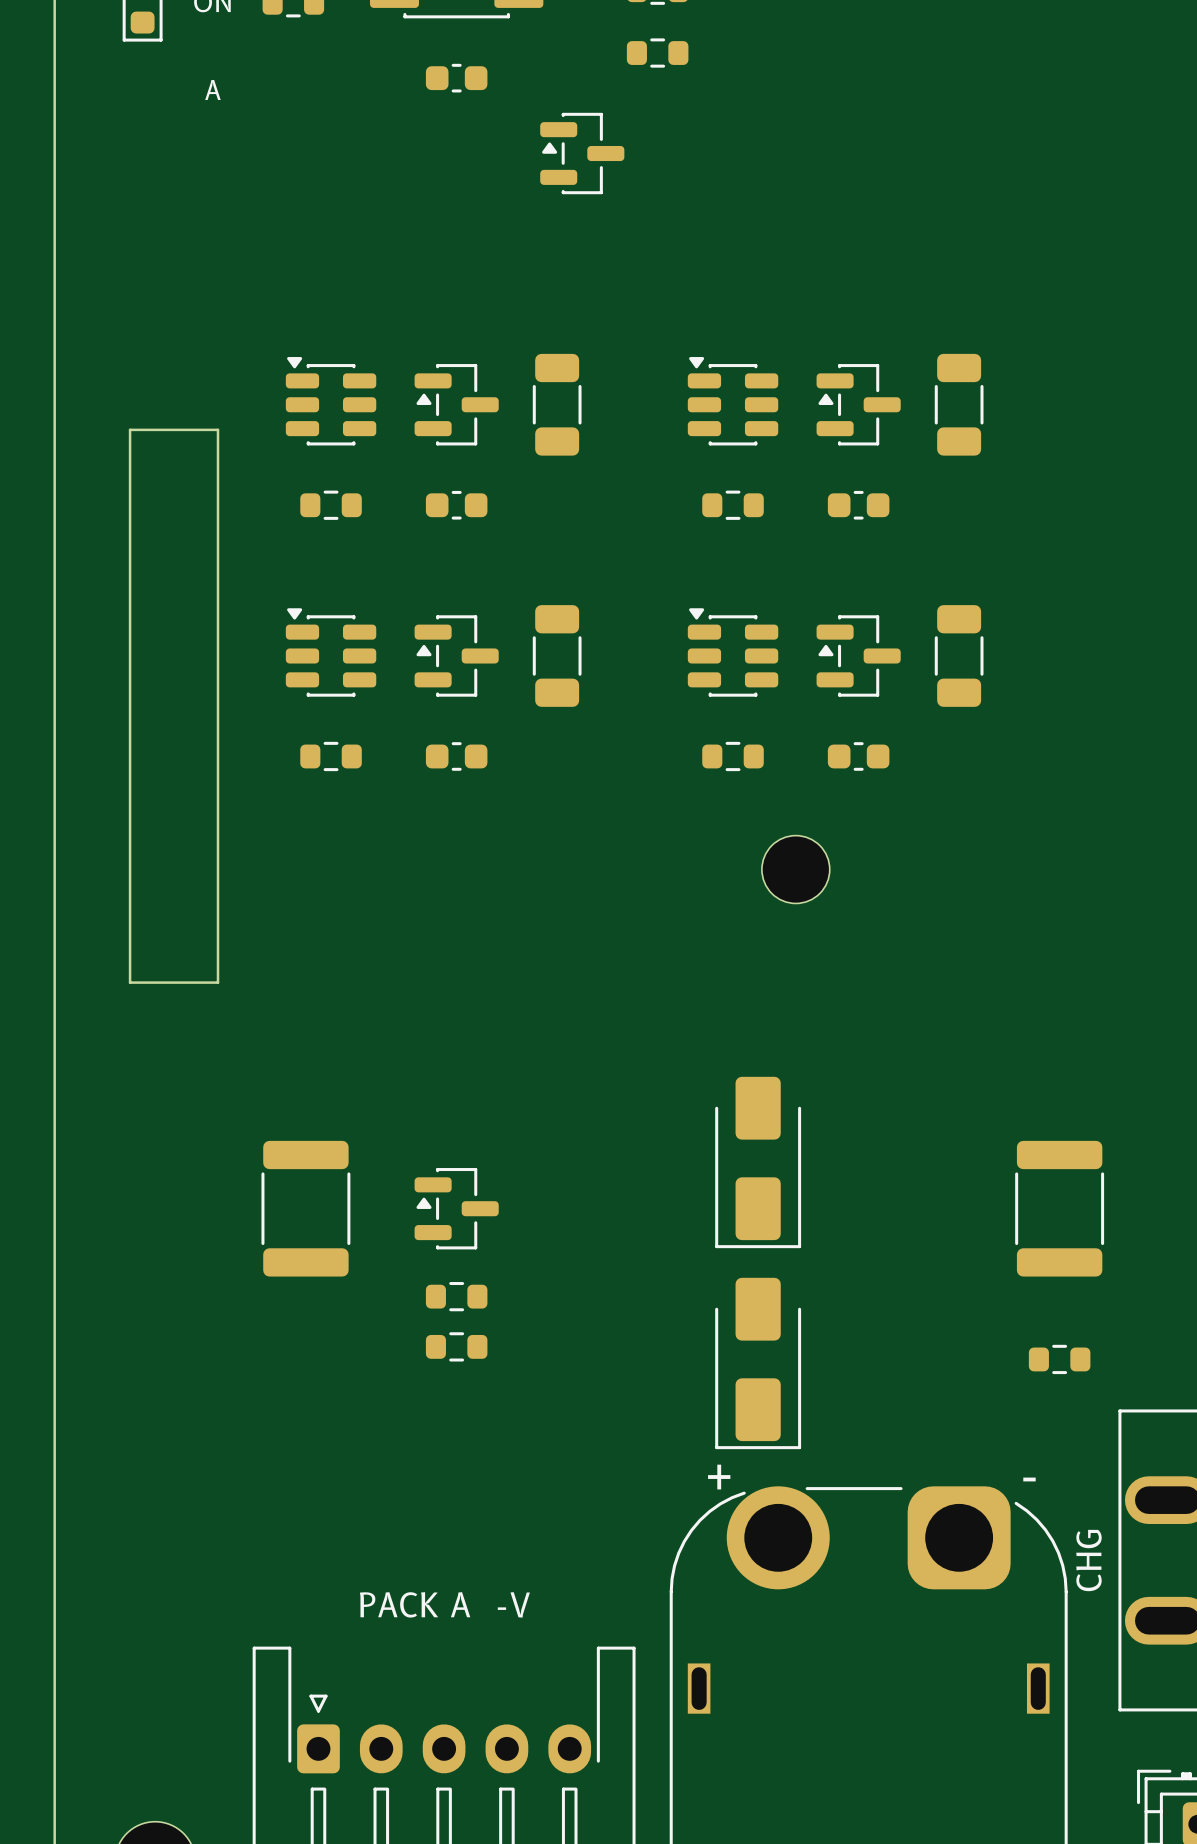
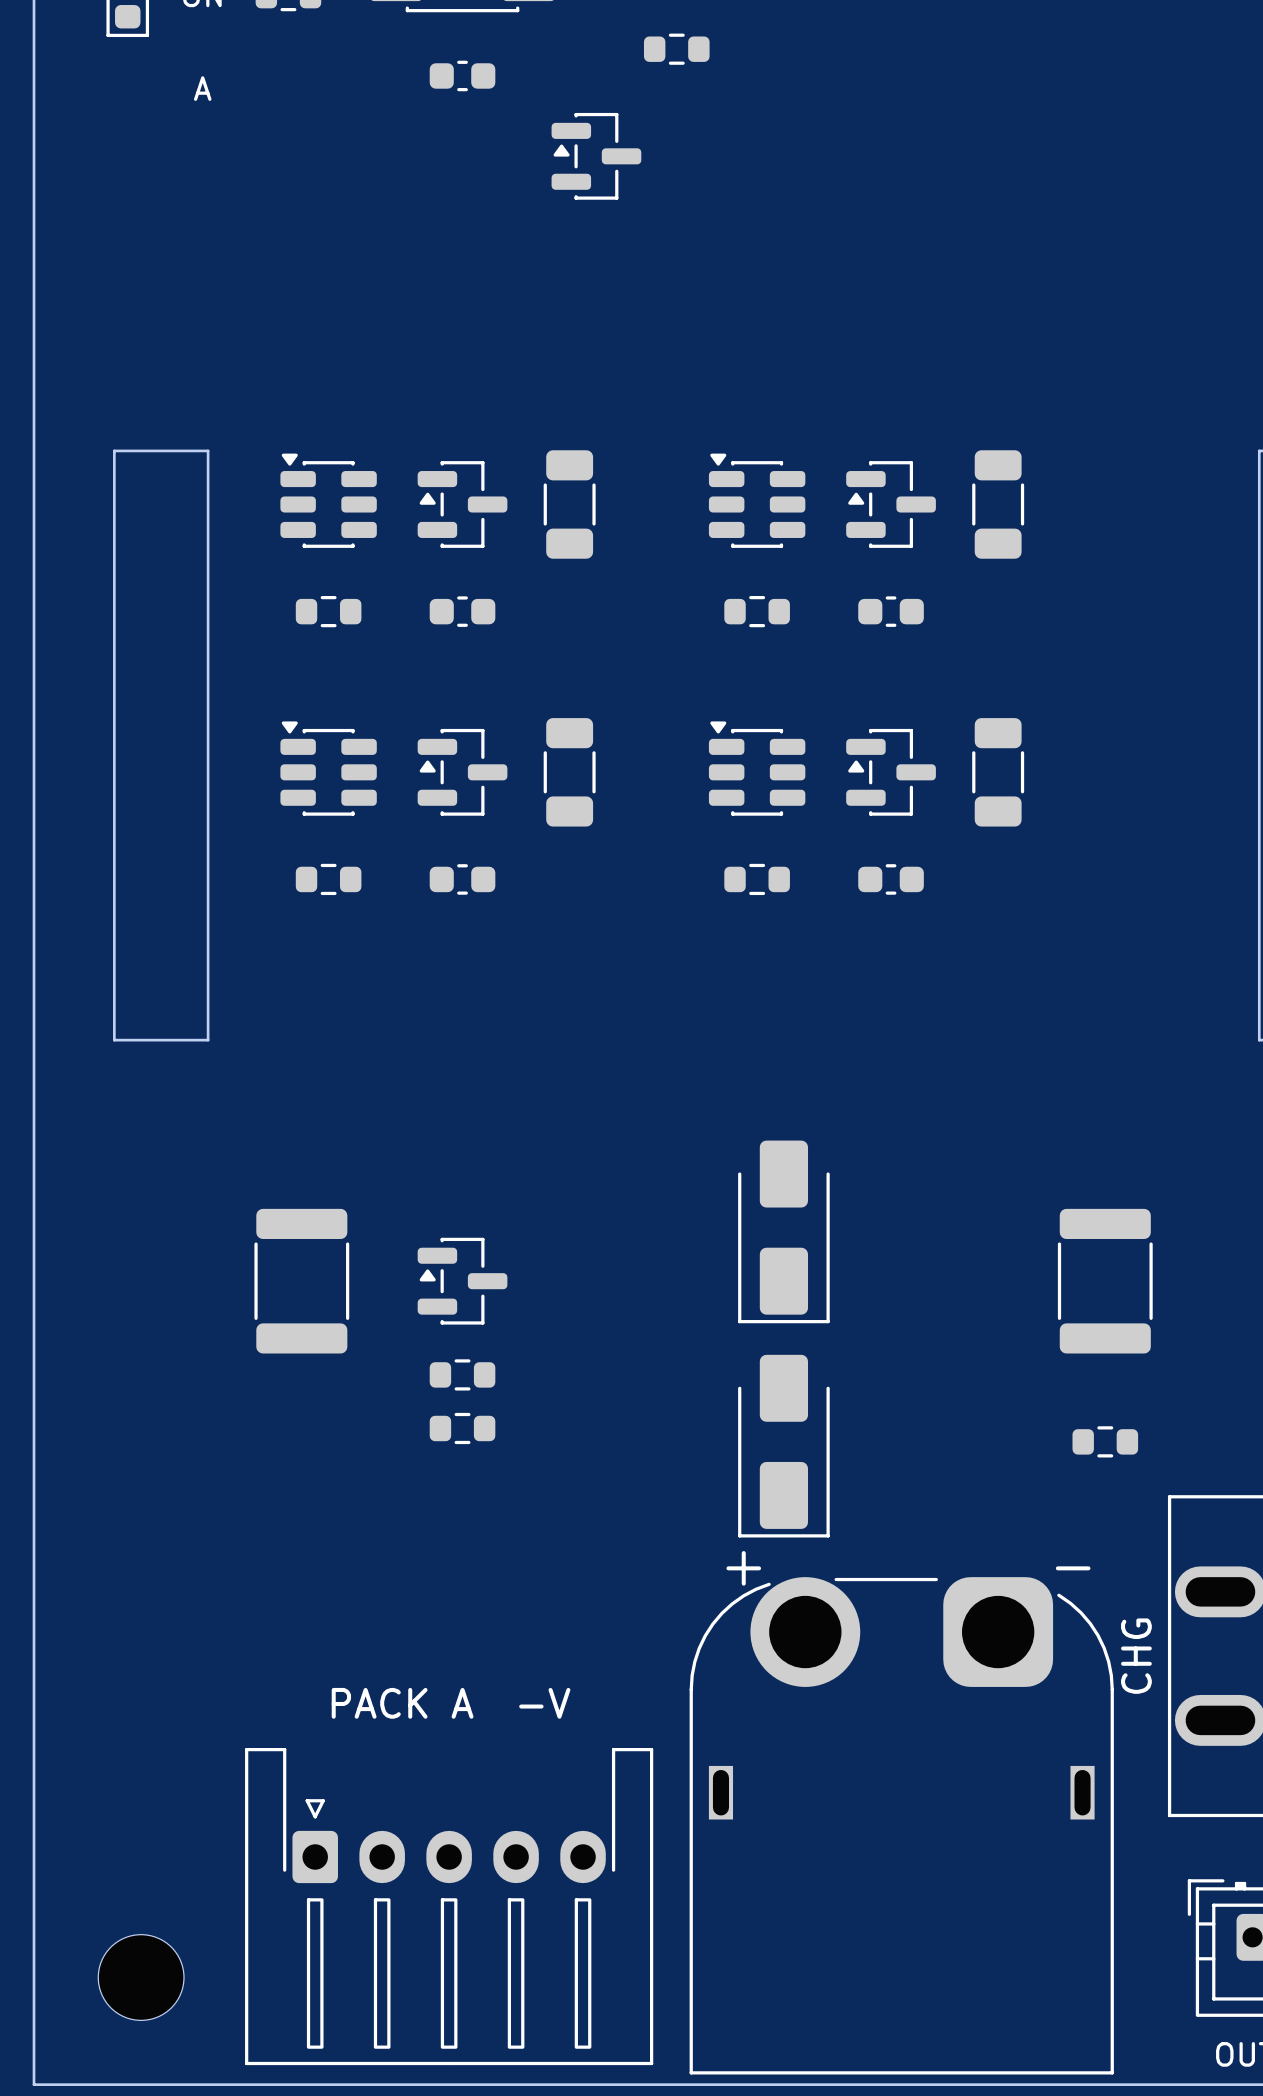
part position: (331, 401) -> (328, 500)
part position: (733, 401) -> (757, 500)
part: (456, 404) -> none
part position: (557, 404) -> (569, 504)
part: (858, 404) -> none
part position: (959, 404) -> (998, 504)
part footprint: [425, 490, 488, 520] -> [417, 461, 508, 548]
part footprint: [827, 490, 890, 520] -> [846, 461, 936, 548]
part position: (331, 505) -> (328, 611)
part position: (733, 505) -> (757, 611)
part: none -> (462, 611)
part: none -> (891, 611)
part position: (331, 652) -> (328, 768)
part position: (733, 652) -> (757, 768)
part: (456, 655) -> none
part position: (557, 655) -> (569, 772)
part: (858, 655) -> none
part position: (959, 655) -> (998, 772)
part footprint: [425, 742, 488, 771] -> [417, 728, 508, 816]
part footprint: [827, 742, 890, 771] -> [846, 728, 936, 816]
part position: (331, 756) -> (328, 879)
part position: (733, 756) -> (757, 879)
part: none -> (462, 879)
part: none -> (891, 879)
part: (795, 869) -> none

